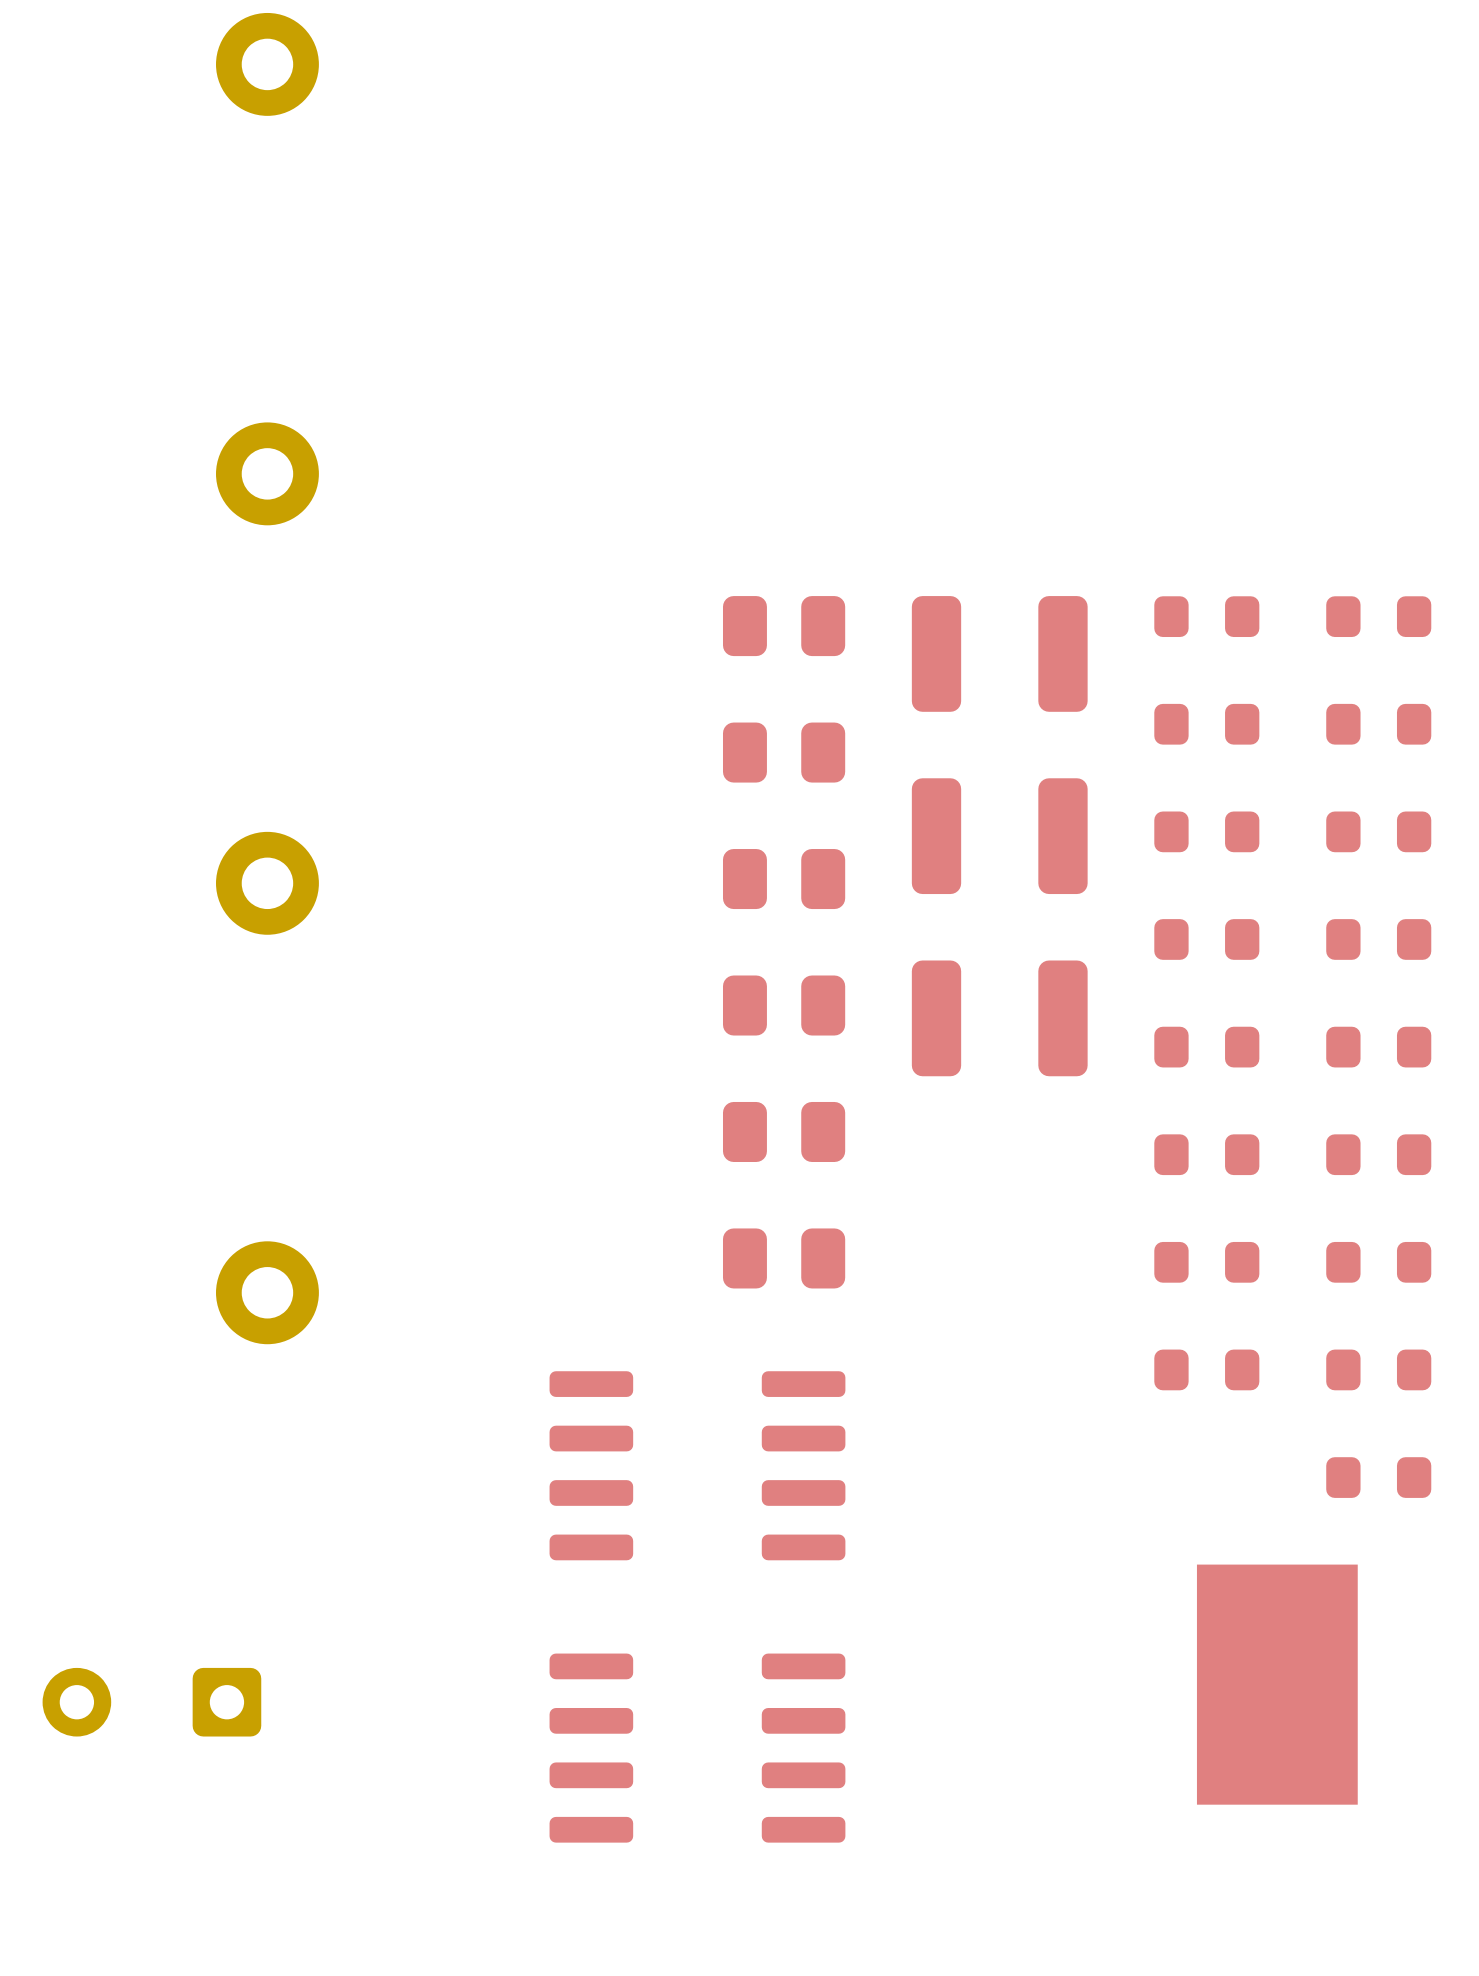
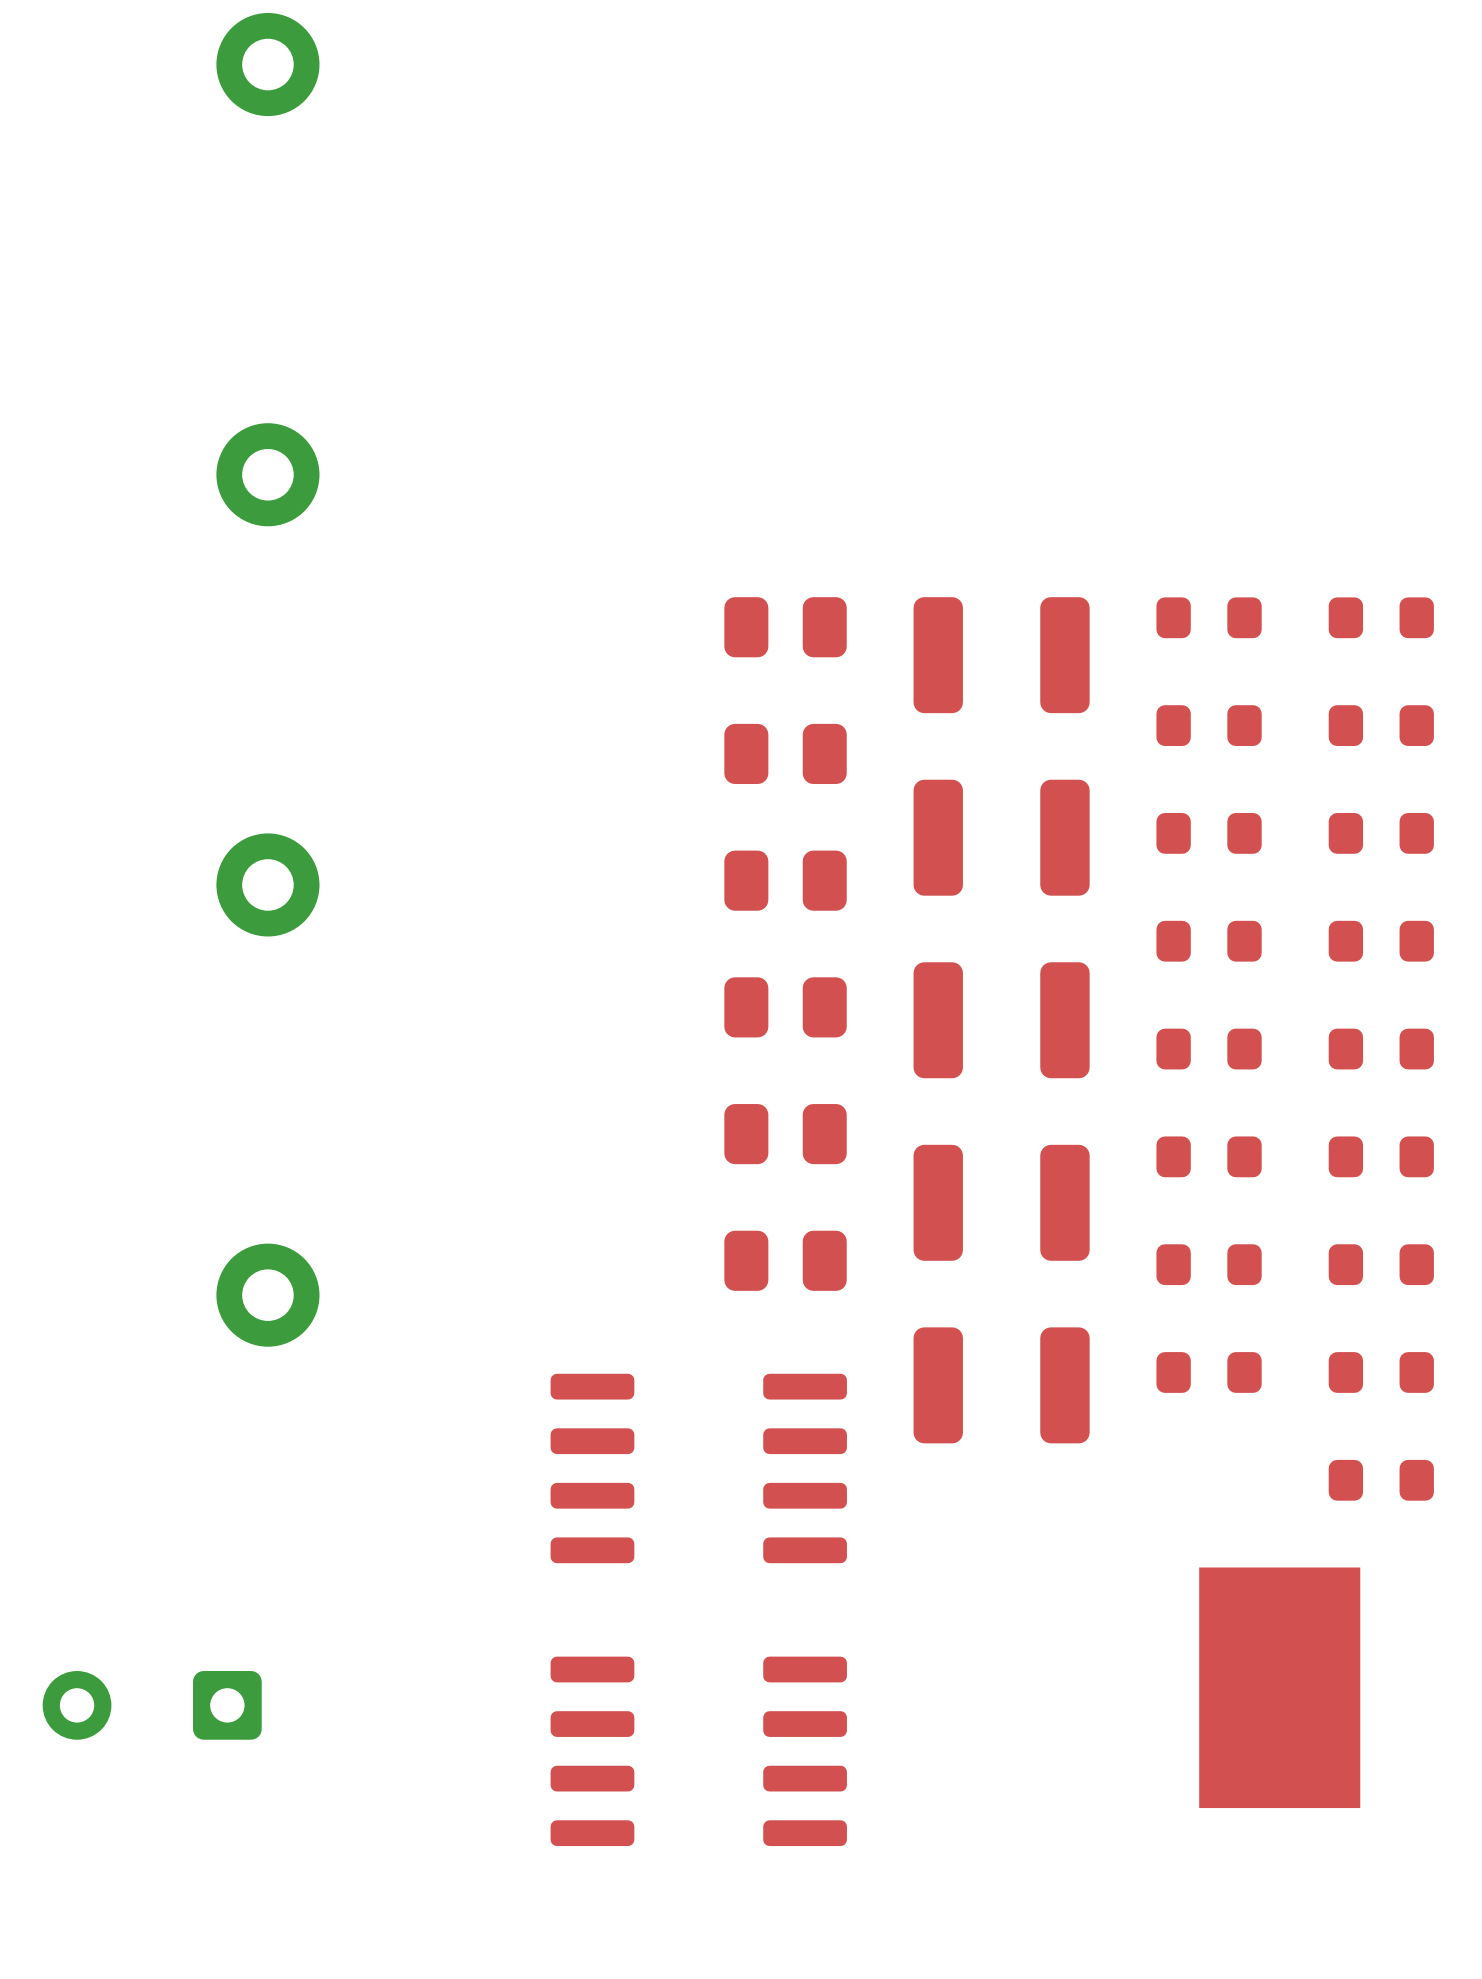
part: none -> (1001, 1202)
part: none -> (1001, 1385)

